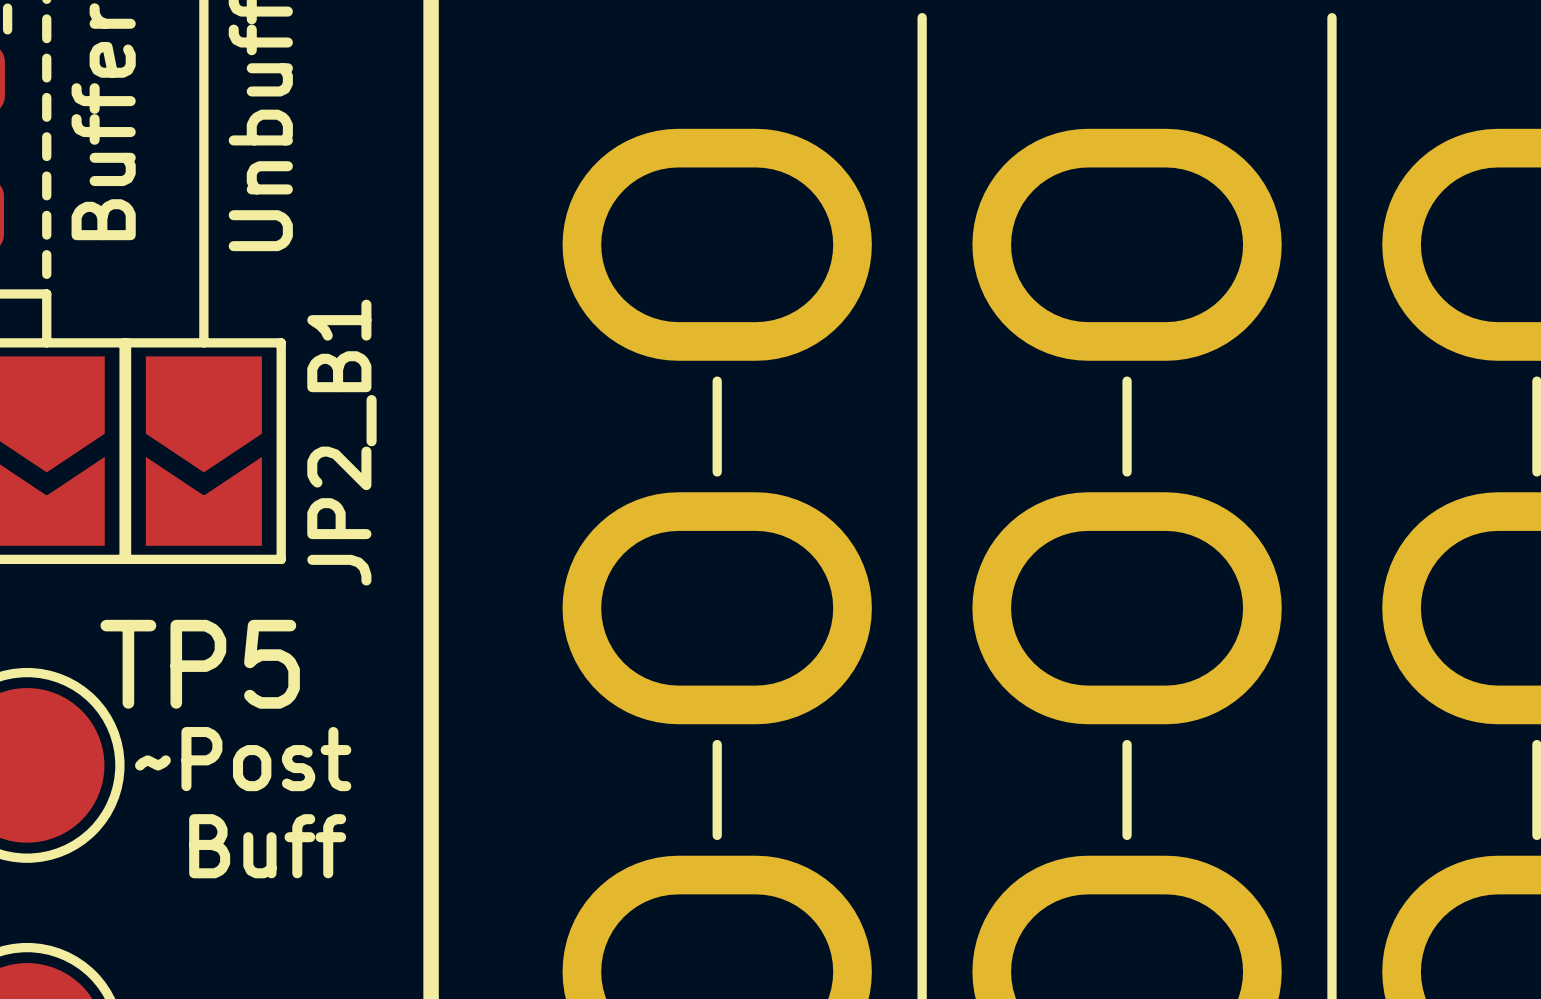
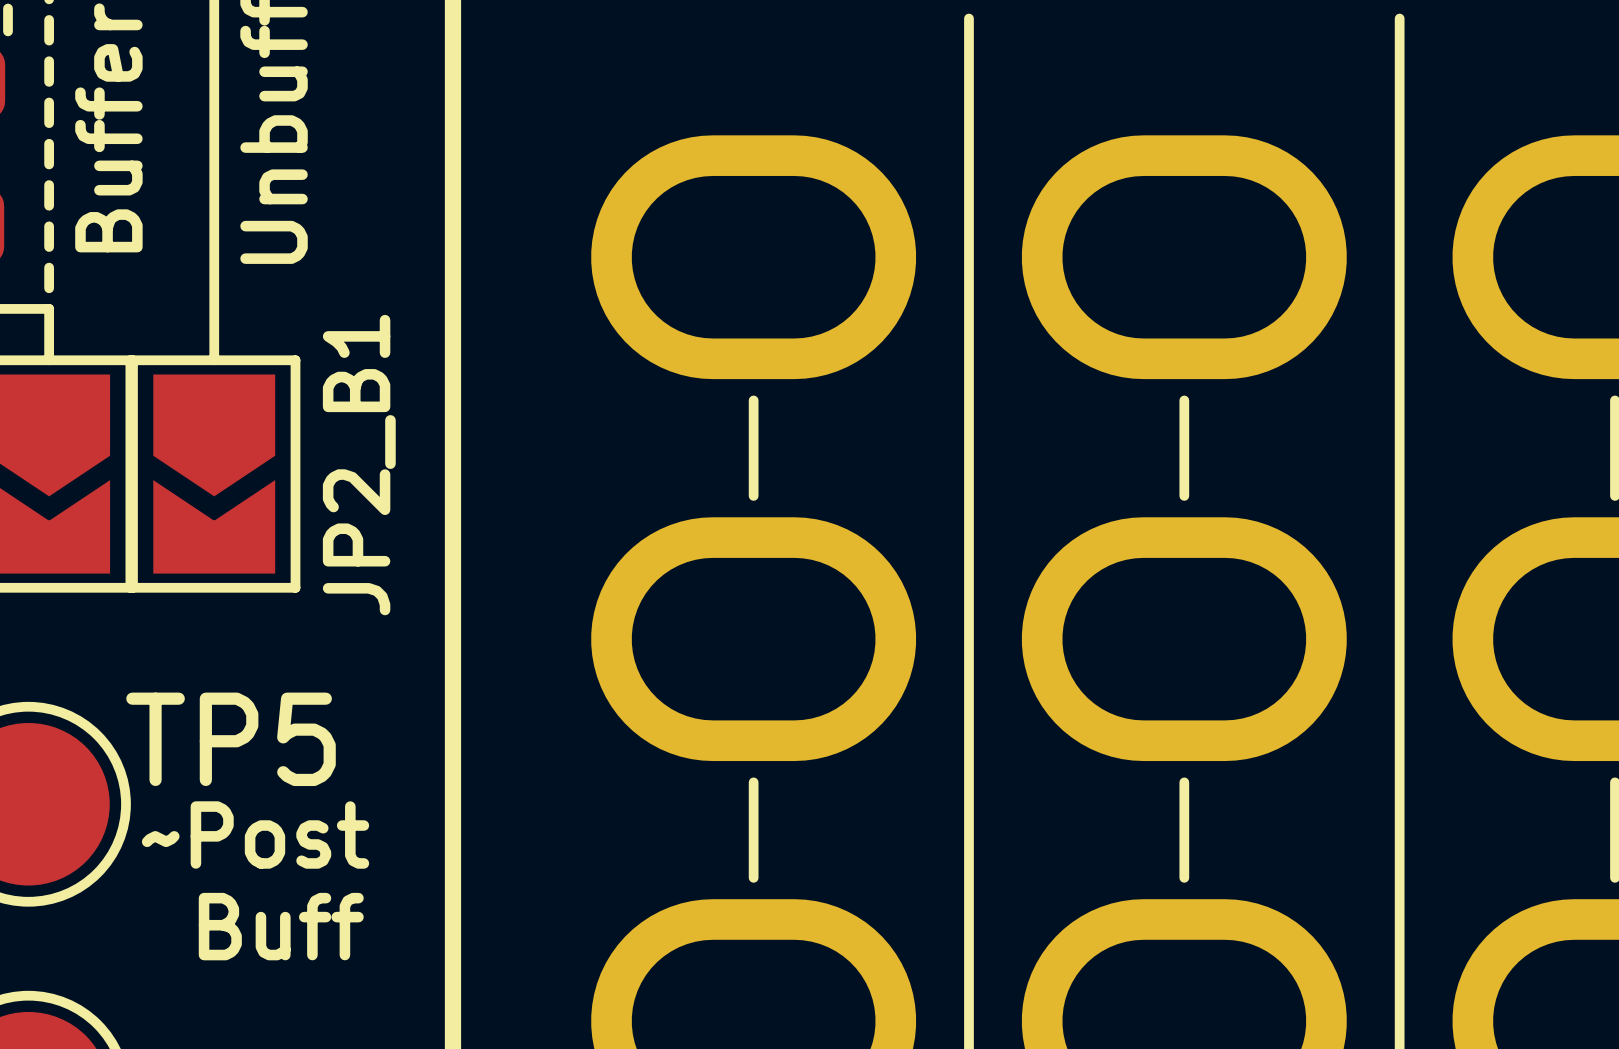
TP5 name position: TP5 (200, 664) -> TP5 (231, 739)
text position: ~Post (243, 759) -> ~Post (255, 835)
text position: Buff (267, 846) -> Buff (281, 926)

